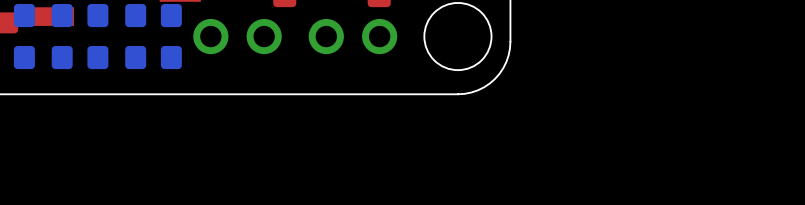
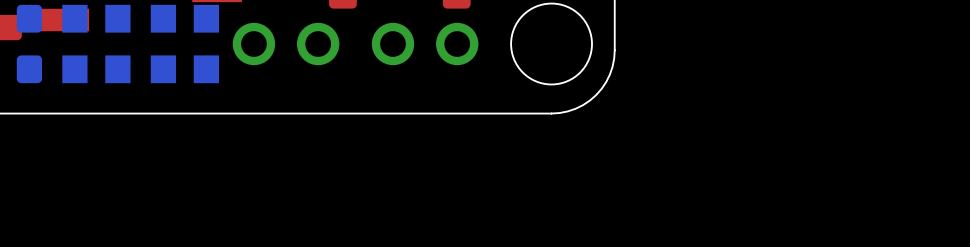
part footprint: [51, 4, 109, 28] -> [62, 4, 131, 33]
part footprint: [125, 4, 182, 28] -> [150, 4, 220, 33]
part footprint: [51, 45, 109, 70] -> [62, 55, 131, 84]
part footprint: [125, 45, 182, 70] -> [150, 55, 220, 84]

